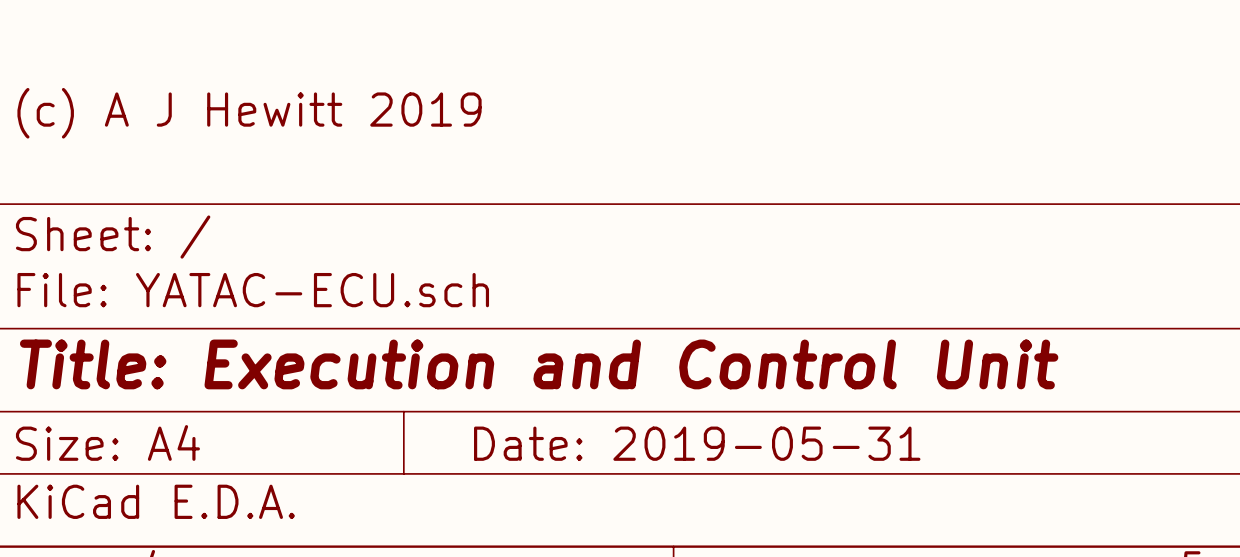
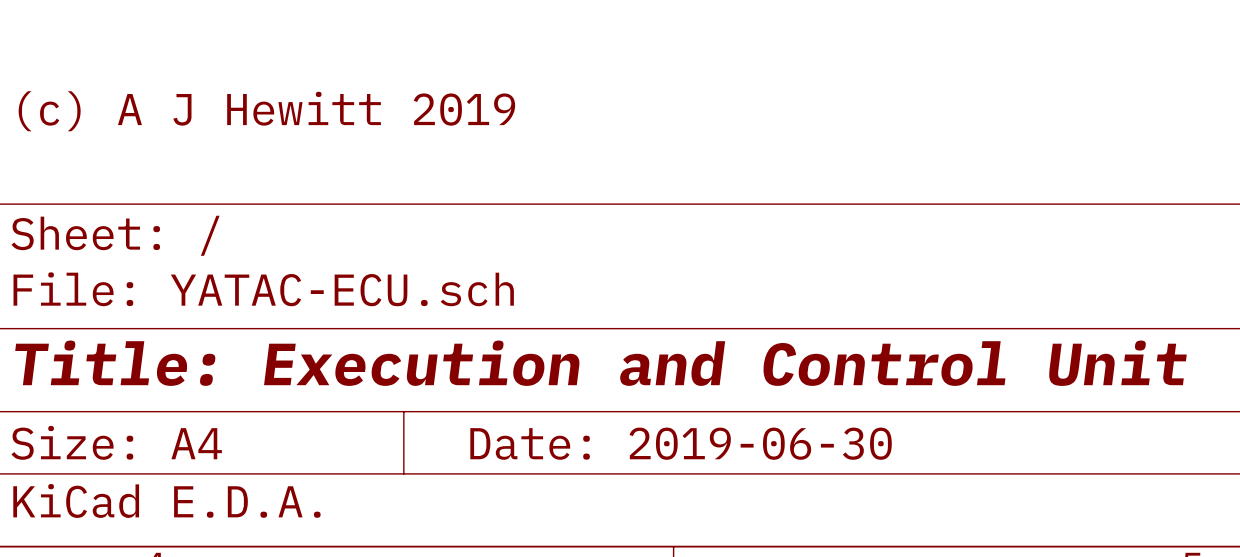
title block: Date: 2019-05-31 (697, 443) -> Date: 2019-06-30 (681, 443)

